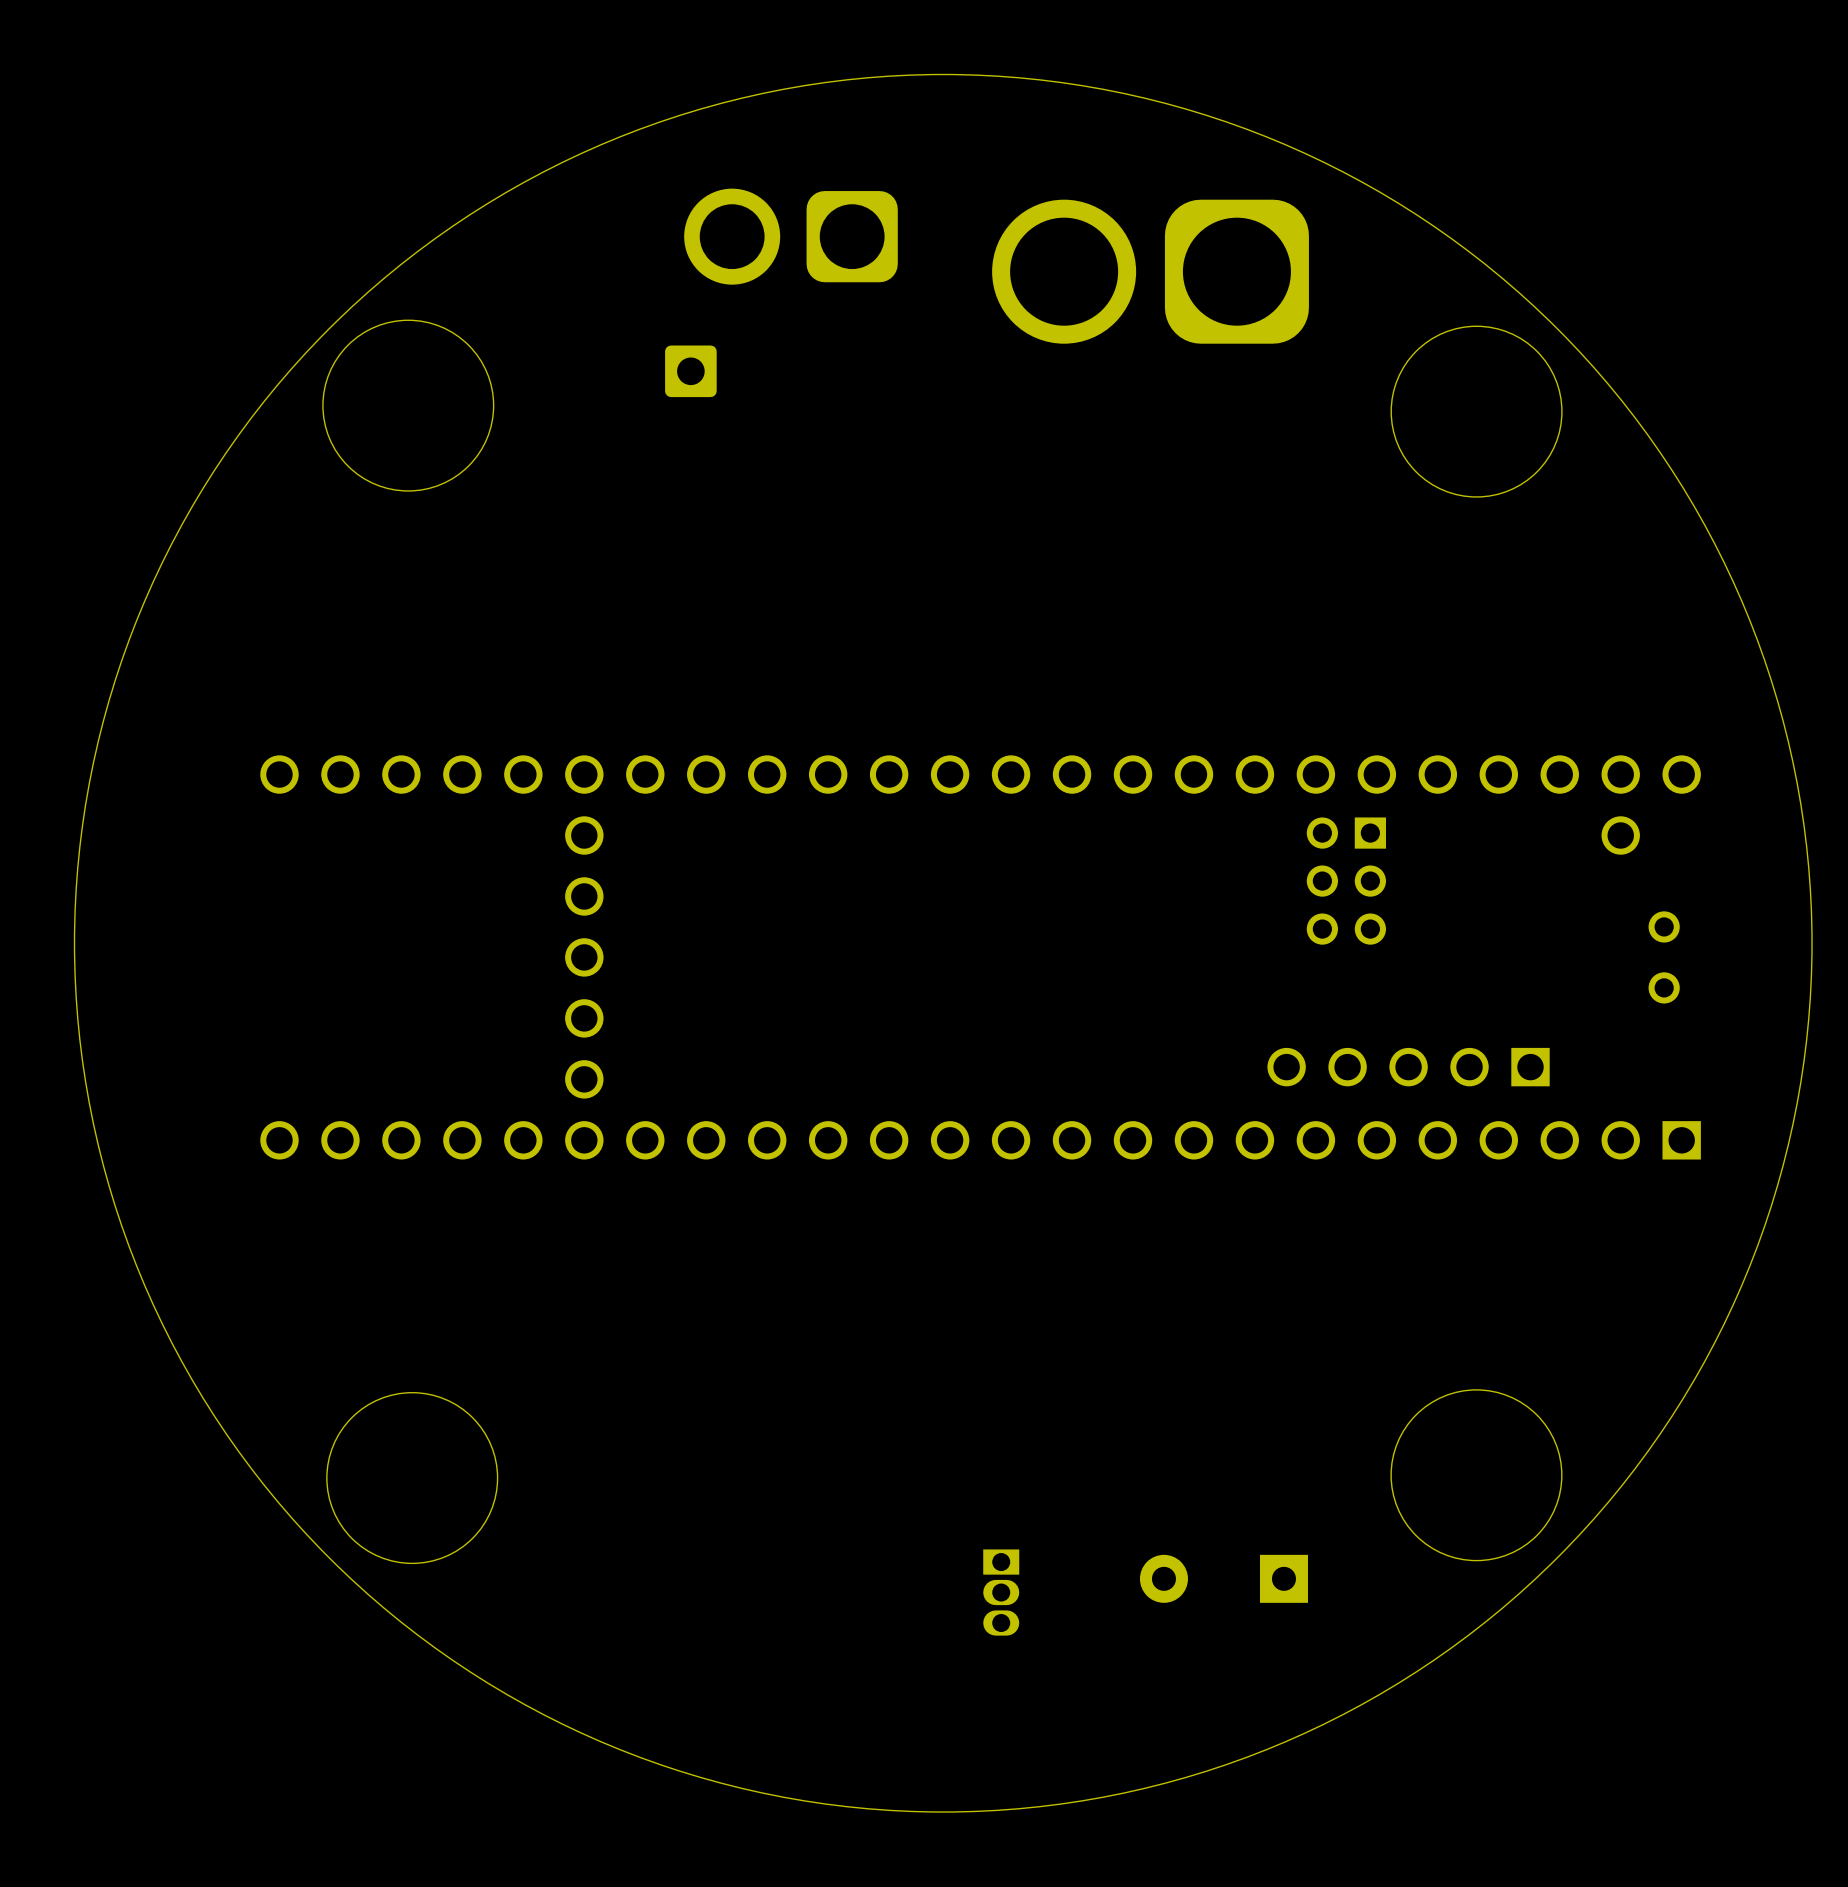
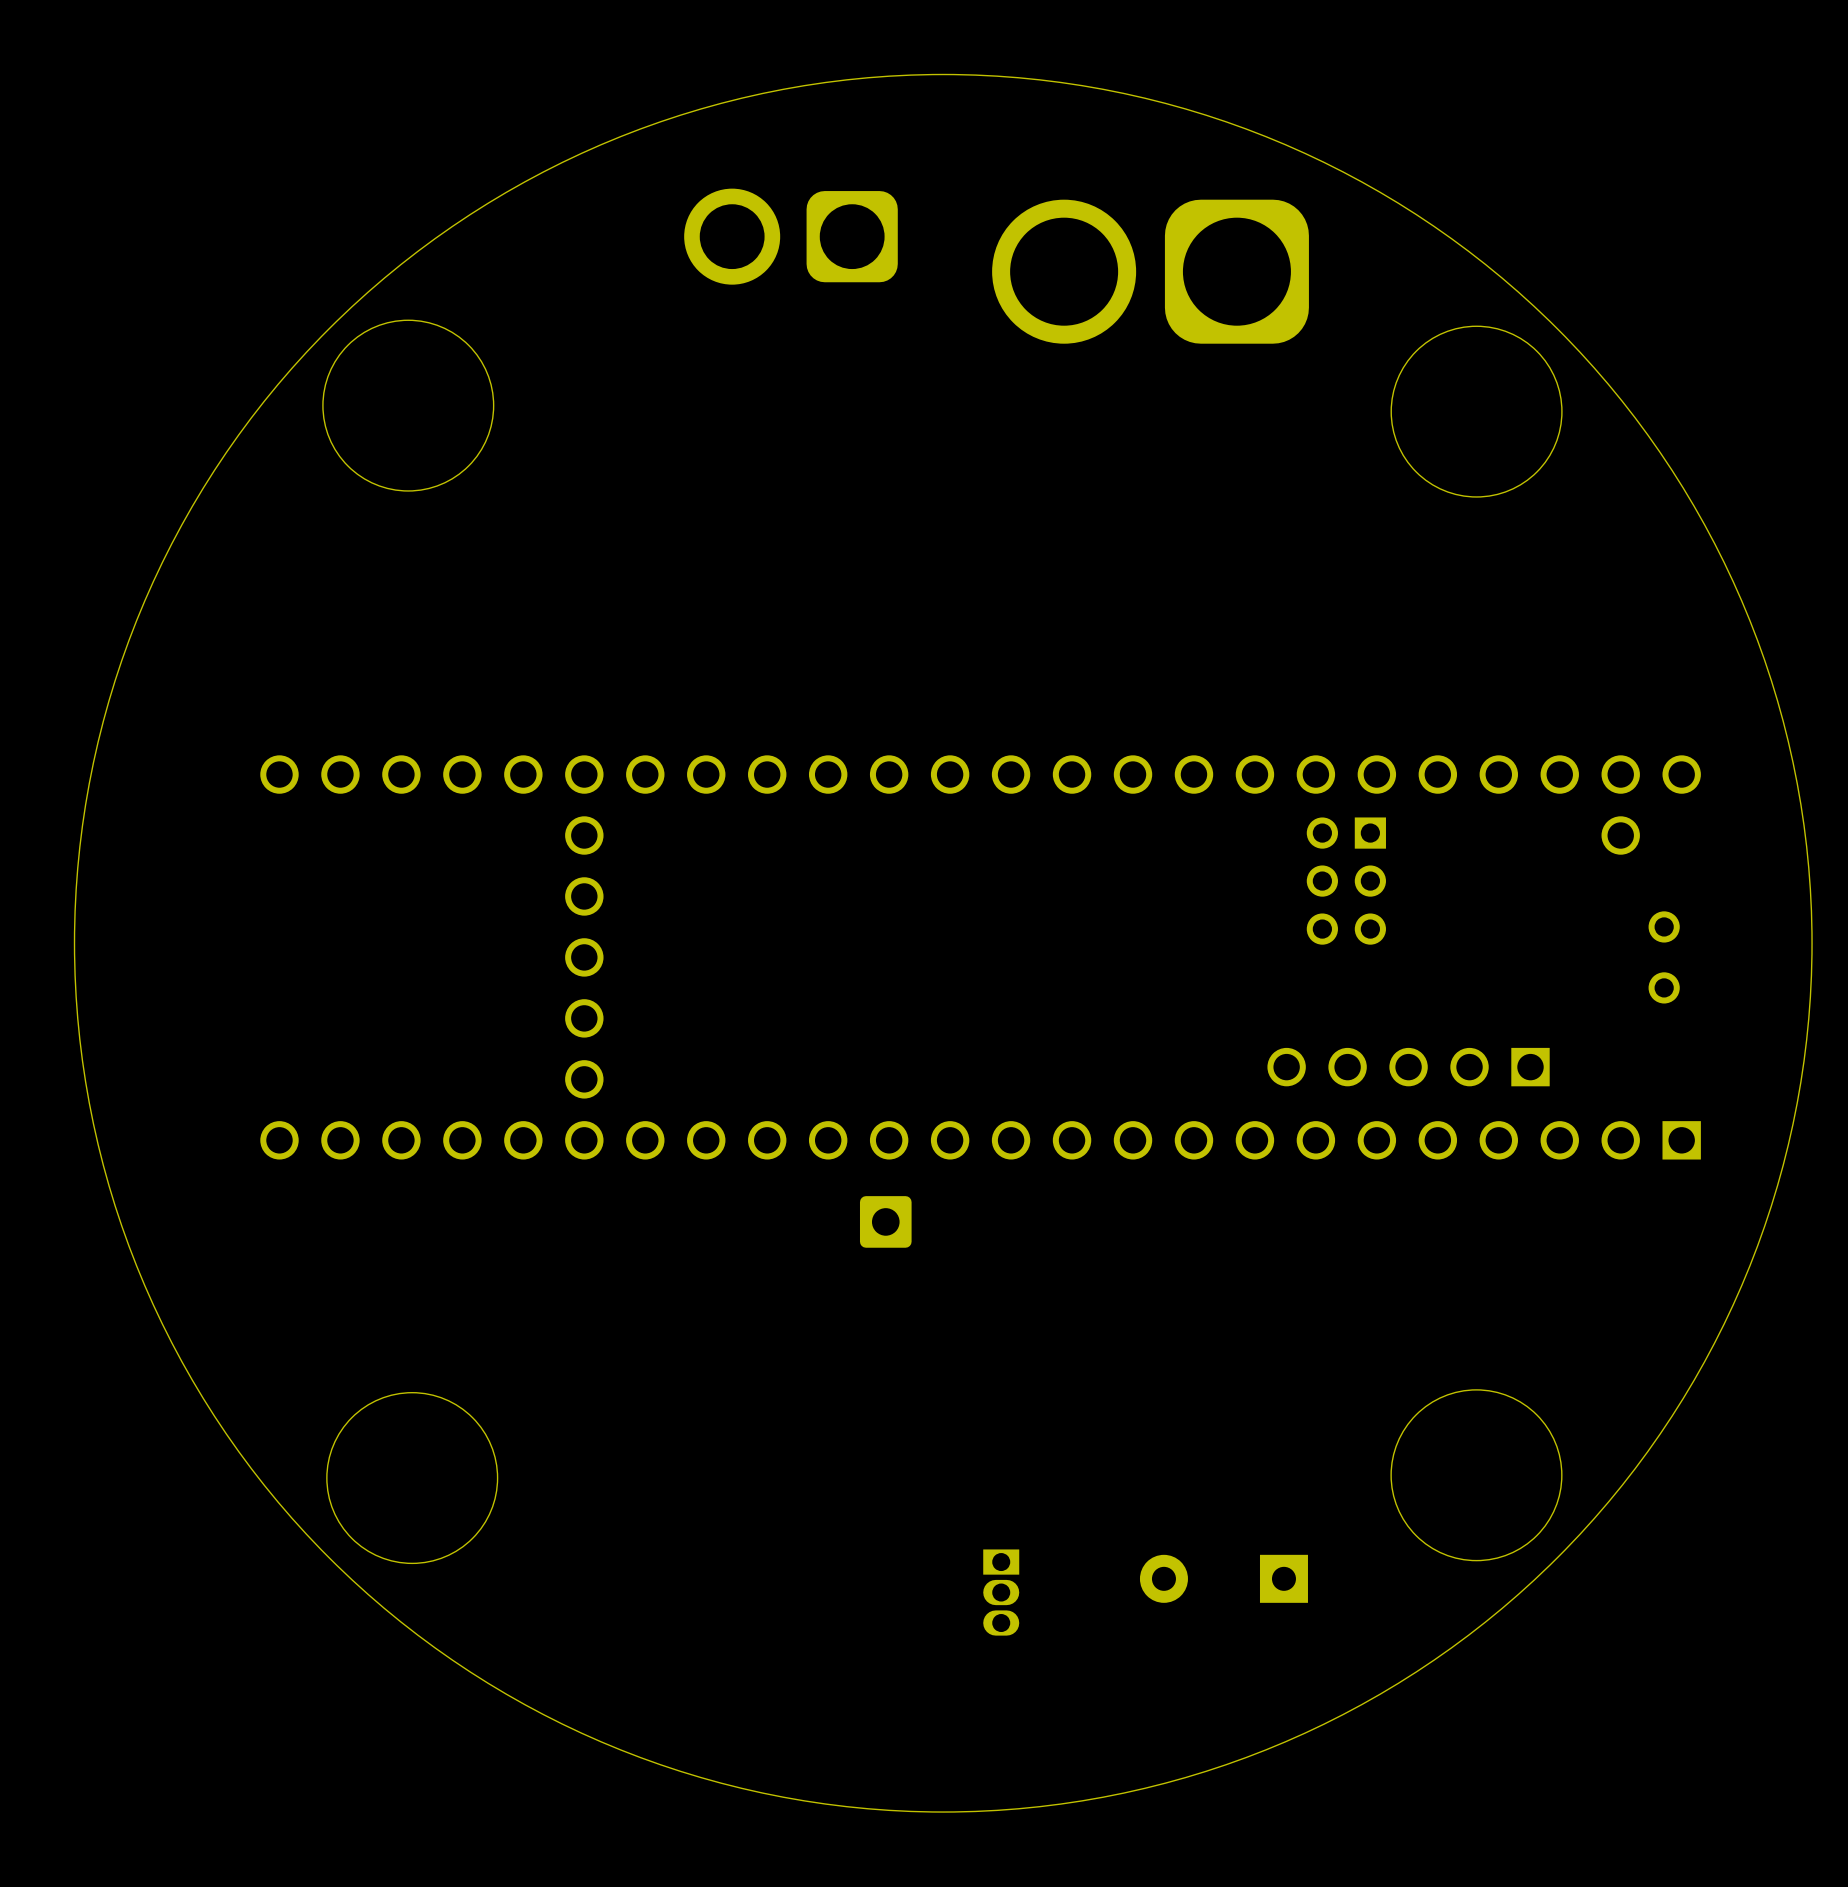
part: (690, 371) -> none
part: none -> (885, 1221)

